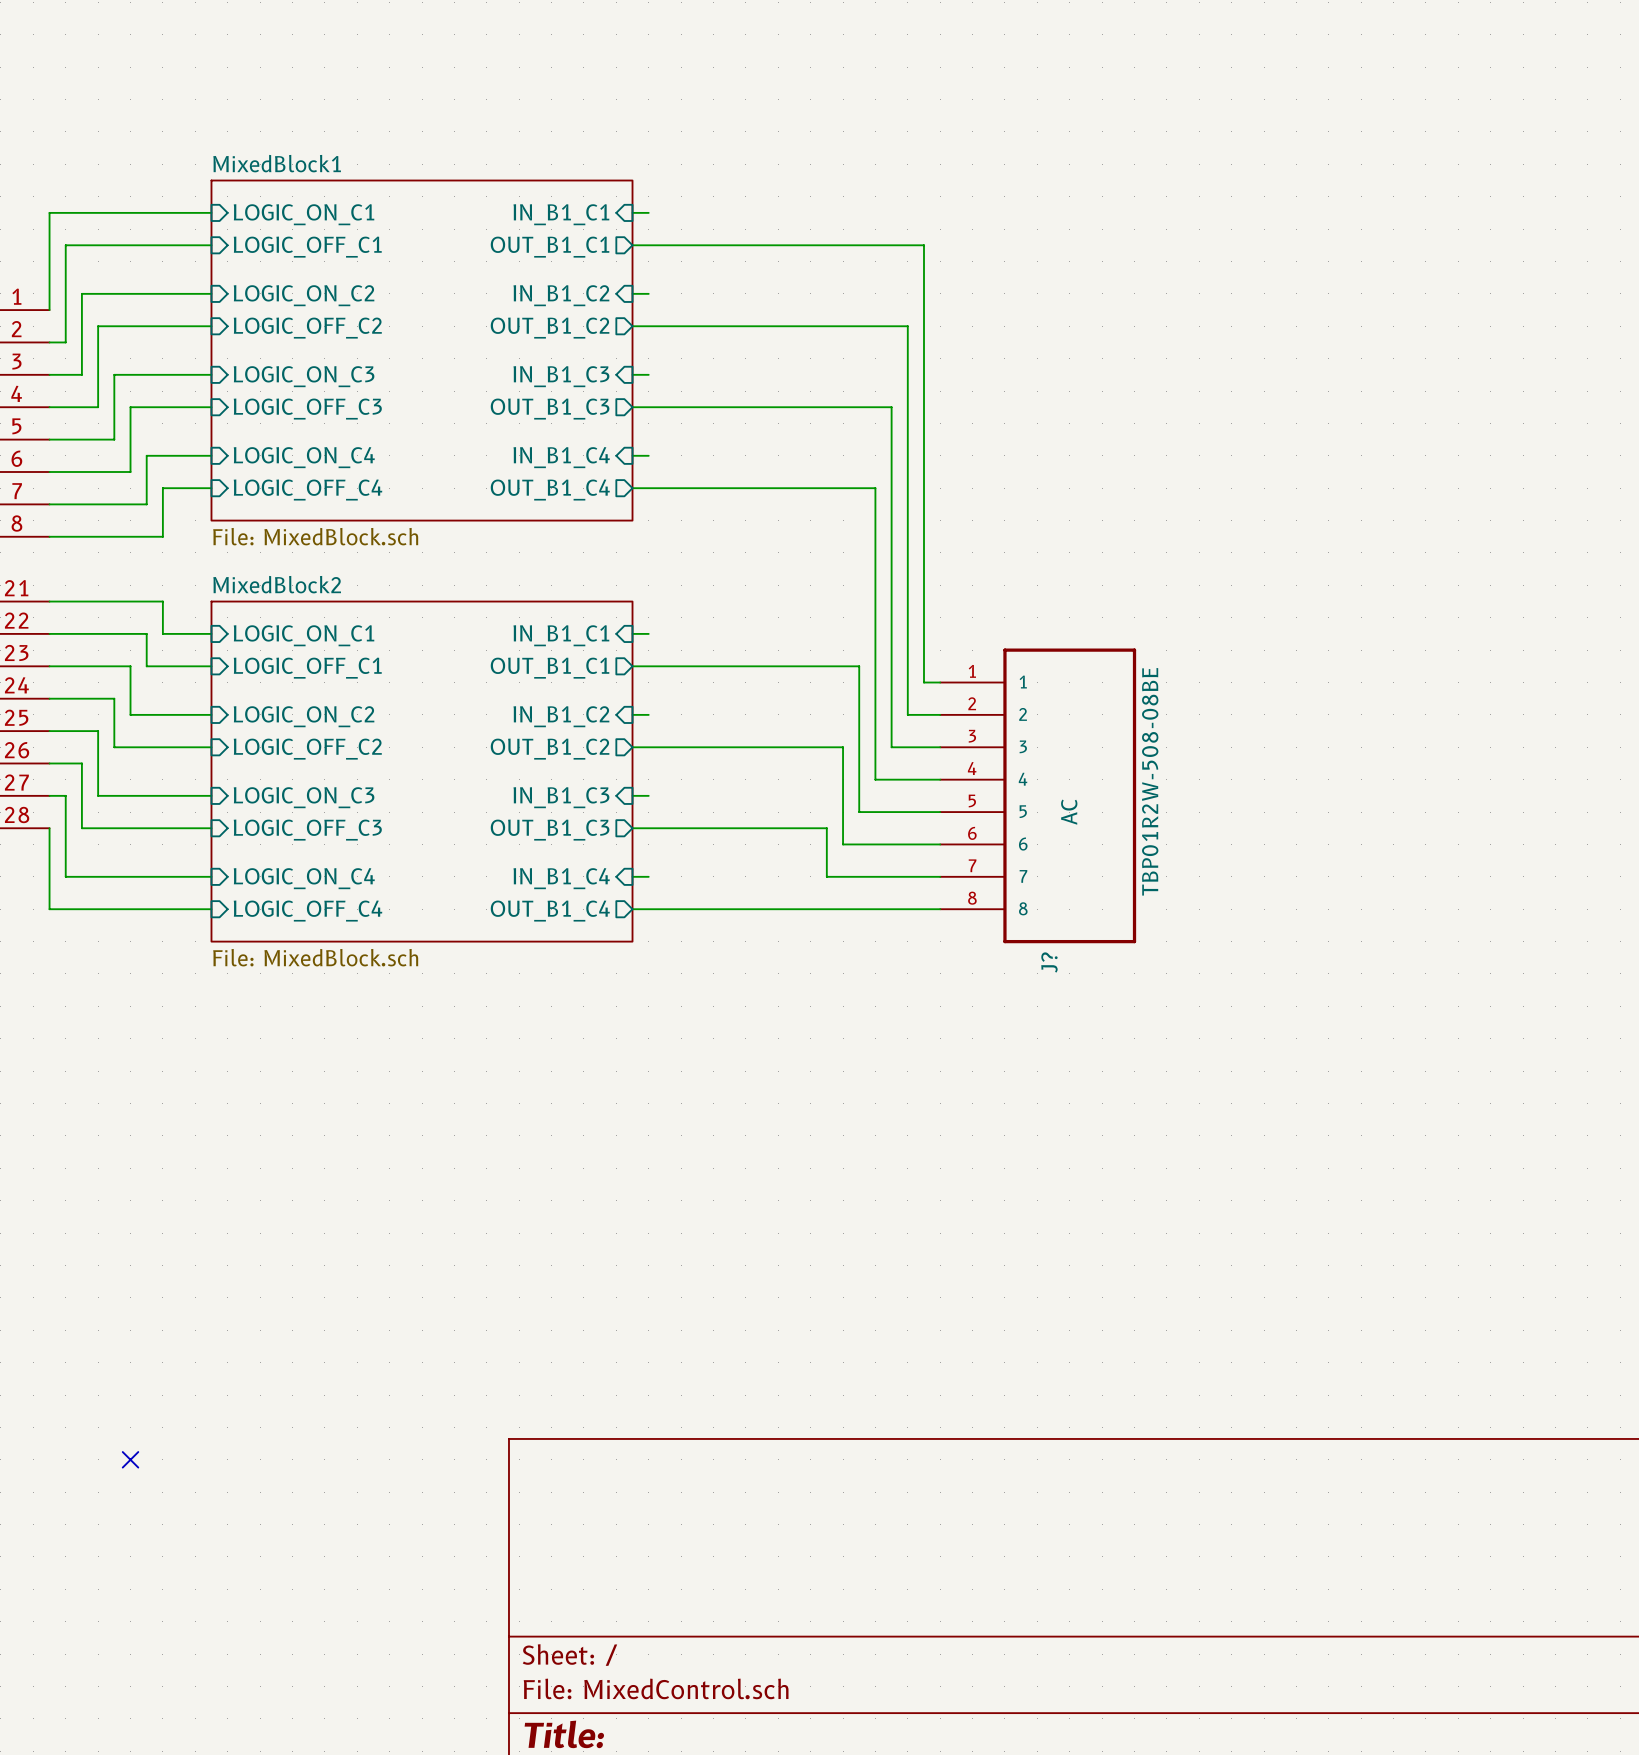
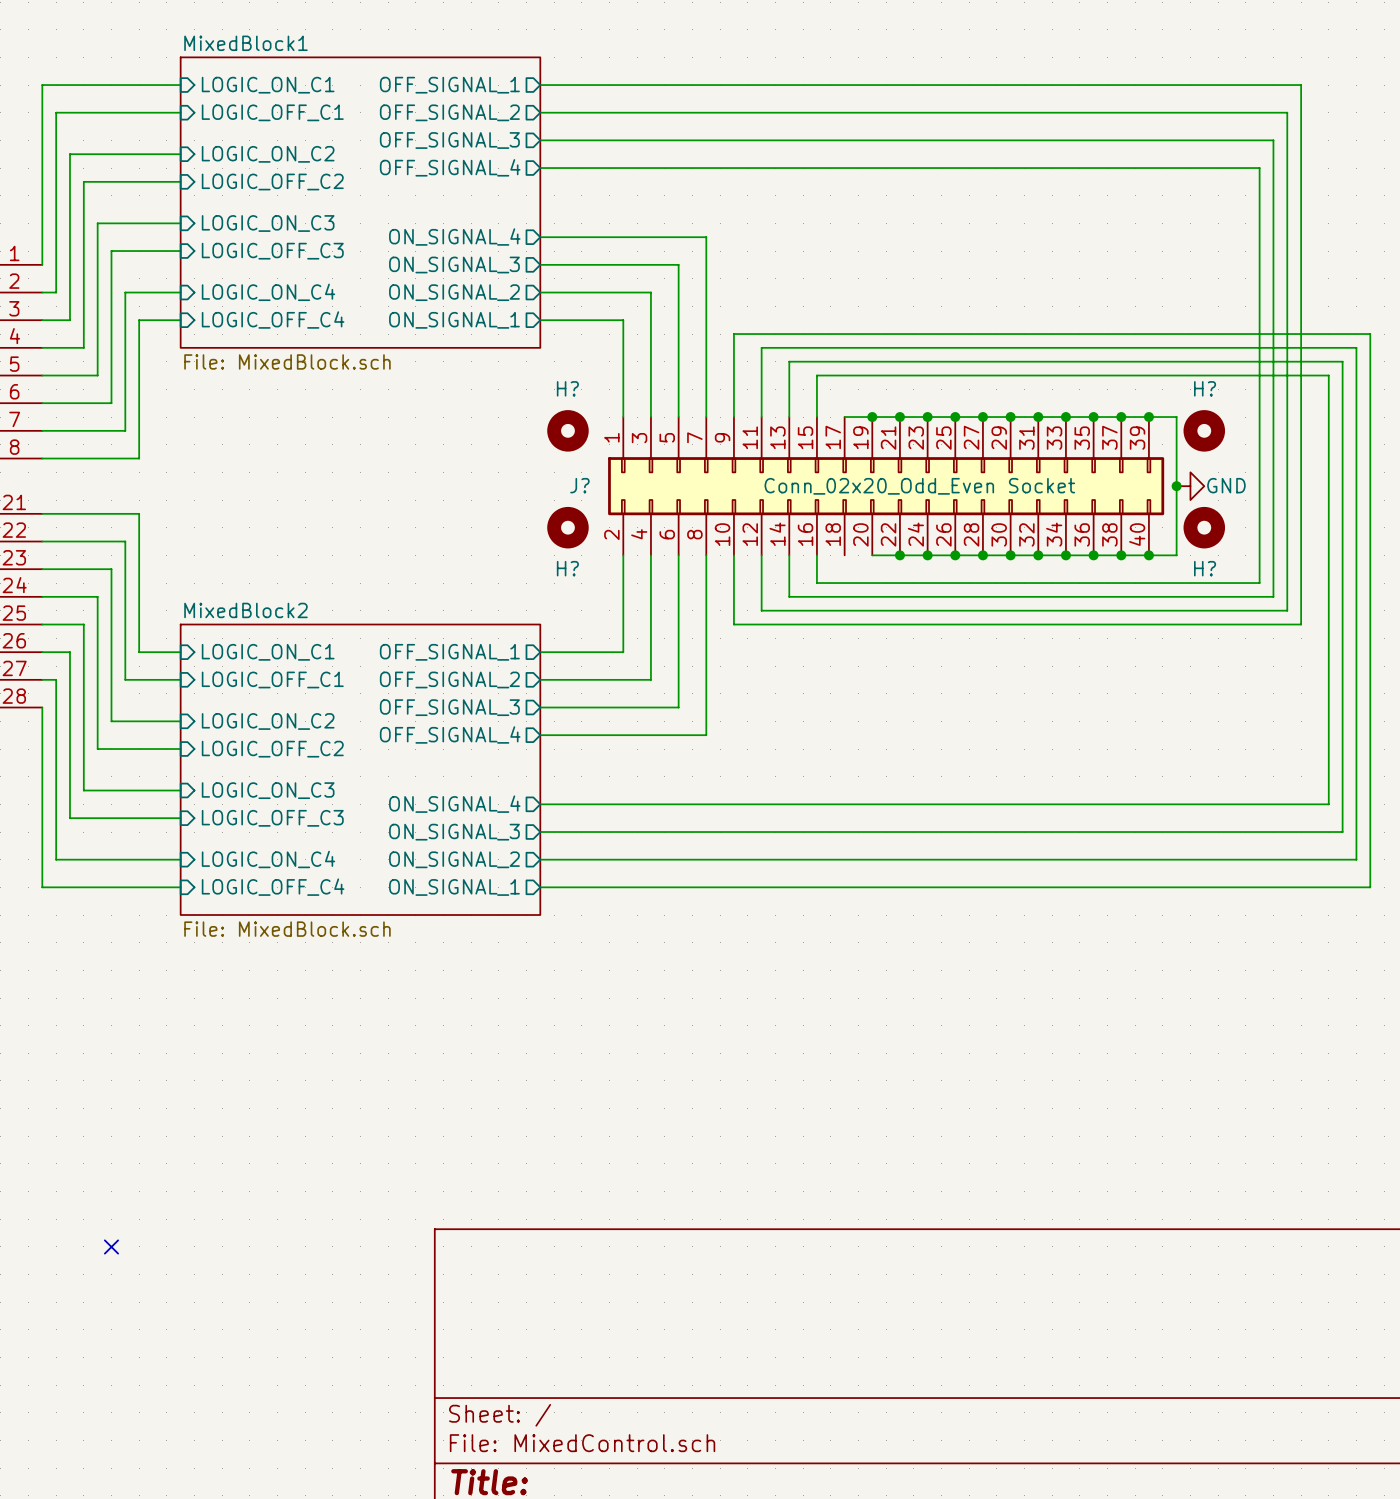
wire: none -> (180, 85) (42, 85) (42, 181)
sheet pin: none -> LOGIC_ON_C1 (268, 85)
sheet pin: none -> OFF_SIGNAL_1 (449, 85)
wire: none -> (540, 112) (1287, 112) (1287, 610) (803, 610)
sheet pin: none -> OFF_SIGNAL_2 (449, 112)
sheet pin: none -> OFF_SIGNAL_3 (449, 140)
wire: none -> (180, 154) (69, 154) (69, 251)
sheet pin: none -> LOGIC_ON_C2 (268, 154)
wire: none -> (540, 168) (1259, 168) (1259, 583) (816, 583) (816, 555)
sheet pin: none -> OFF_SIGNAL_4 (450, 167)
wire: (49, 212) (98, 212) -> (83, 278) (83, 181)
wire: (632, 212) (648, 212) -> none
sheet pin: LOGIC_ON_C1 (304, 214) -> LOGIC_OFF_C2 (272, 182)
sheet pin: IN_B1_C1 (561, 214) -> none
wire: (65, 245) (211, 245) -> (56, 209) (56, 112) (180, 112)
wire: (632, 245) (924, 245) (924, 423) -> (540, 832) (1342, 832) (1342, 361) (789, 361)
sheet pin position: LOGIC_OFF_C1 (307, 247) -> LOGIC_OFF_C1 (272, 112)
sheet pin: OUT_B1_C1 (550, 247) -> none
sheet pin: none -> LOGIC_ON_C3 (268, 223)
wire: none -> (540, 237) (706, 237) (706, 417)
sheet pin: none -> ON_SIGNAL_4 (454, 237)
wire: (81, 293) (130, 293) -> (111, 347) (111, 251)
wire: (632, 293) (648, 293) -> none
sheet pin: LOGIC_ON_C2 (304, 295) -> LOGIC_OFF_C3 (272, 251)
sheet pin: IN_B1_C2 (561, 295) -> none
wire: none -> (540, 264) (678, 264) (678, 417)
sheet pin: none -> ON_SIGNAL_3 (454, 265)
wire: (98, 326) (211, 326) -> none
wire: (632, 326) (907, 326) (907, 714) -> none
sheet pin: LOGIC_OFF_C2 (307, 328) -> none
sheet pin: OUT_B1_C2 (550, 328) -> none
wire: none -> (540, 292) (650, 292) (650, 417)
sheet pin: none -> ON_SIGNAL_2 (454, 292)
sheet MixedBlock1 position: (422, 350) -> (360, 202)
wire: (114, 374) (162, 374) -> (97, 320) (97, 223) (180, 223)
wire: none -> (554, 320) (623, 320) (623, 417)
sheet pin: LOGIC_ON_C3 (304, 376) -> LOGIC_OFF_C4 (273, 320)
sheet pin shape: input (561, 376) -> output (454, 320)
sheet pin: IN_B1_C3 (561, 376) -> ON_SIGNAL_1 (454, 320)
wire: (130, 407) (211, 407) -> none
wire: (632, 407) (891, 407) -> (540, 859) (1356, 859) (1356, 347) (761, 347)
sheet pin: LOGIC_OFF_C3 (307, 409) -> none
sheet pin: OUT_B1_C3 (550, 409) -> none
wire: (146, 455) (211, 455) -> (125, 389) (125, 292) (180, 292)
wire: (632, 455) (648, 455) -> none
sheet pin position: LOGIC_ON_C4 (304, 457) -> LOGIC_ON_C4 (268, 292)
sheet pin: IN_B1_C4 (561, 457) -> none
wire: (162, 488) (211, 488) -> (139, 417) (139, 320)
wire: (632, 488) (875, 488) (875, 779) (940, 779) -> none
wire: none -> (733, 417) (733, 334) (1370, 334) (1370, 887) (540, 887)
wire: none -> (816, 417) (816, 375) (1328, 375) (1328, 804) (540, 804)
wire: none -> (844, 417) (1176, 417) (1176, 555) (872, 555)
junction: none -> (872, 417)
junction: none -> (899, 417)
junction: none -> (927, 417)
junction: none -> (955, 417)
junction: none -> (982, 417)
junction: none -> (1010, 417)
junction: none -> (1038, 417)
junction: none -> (1065, 417)
junction: none -> (1093, 417)
junction: none -> (1121, 417)
junction: none -> (1148, 417)
sheet pin: LOGIC_OFF_C4 (308, 490) -> none
sheet pin: OUT_B1_C4 (550, 490) -> none
H?: none -> (567, 430)
H?: none -> (1204, 430)
J?: none -> Conn_02x20_Odd_Even Socket (886, 486)
junction: none -> (1176, 486)
power symbol: none -> GND (1190, 486)
H?: none -> (567, 527)
H?: none -> (1204, 527)
wire: (162, 633) (211, 633) -> (139, 541) (139, 652) (180, 652)
wire: (632, 633) (648, 633) -> none
sheet pin position: LOGIC_ON_C1 (304, 635) -> LOGIC_ON_C1 (268, 652)
sheet pin: IN_B1_C1 (561, 635) -> none
wire: none -> (623, 555) (623, 652) (540, 652)
wire: none -> (650, 555) (650, 679) (554, 679)
wire: none -> (706, 555) (706, 707)
junction: none -> (899, 555)
junction: none -> (927, 555)
junction: none -> (955, 555)
junction: none -> (982, 555)
junction: none -> (1010, 555)
junction: none -> (1038, 555)
junction: none -> (1065, 555)
junction: none -> (1093, 555)
junction: none -> (1121, 555)
junction: none -> (1148, 555)
wire: (146, 666) (211, 666) -> none
wire: (632, 666) (859, 666) -> (733, 555) (733, 569)
sheet pin: LOGIC_OFF_C1 (307, 668) -> none
sheet pin: OUT_B1_C1 (550, 668) -> none
wire: (924, 682) (940, 682) -> (789, 583) (789, 596) (1273, 596) (1273, 140) (540, 140)
wire: (130, 714) (211, 714) -> (111, 610) (111, 721) (180, 721)
wire: (632, 714) (648, 714) -> none
wire: (891, 714) (891, 747) (940, 747) -> (761, 610) (775, 610)
sheet pin position: LOGIC_ON_C2 (304, 716) -> LOGIC_ON_C2 (268, 721)
sheet pin: IN_B1_C2 (561, 716) -> none
wire: (859, 731) (859, 812) (940, 812) -> (733, 624) (1301, 624) (1301, 85) (540, 85)
wire: (114, 747) (211, 747) -> none
wire: (632, 747) (843, 747) (843, 844) (940, 844) -> none
sheet pin: LOGIC_OFF_C2 (307, 749) -> none
sheet pin: OUT_B1_C2 (550, 749) -> none
sheet pin: none -> OFF_SIGNAL_1 (449, 652)
sheet MixedBlock2 position: (422, 771) -> (360, 769)
wire: (98, 795) (146, 795) -> (125, 569) (125, 679)
wire: none -> (83, 679) (83, 790) (180, 790)
J?: TBP01R2W-508-08BE (1038, 795) -> none
sheet pin: LOGIC_ON_C3 (304, 797) -> LOGIC_OFF_C1 (272, 679)
sheet pin shape: input (561, 797) -> output (449, 679)
sheet pin: IN_B1_C3 (561, 797) -> OFF_SIGNAL_2 (449, 679)
wire: (81, 828) (211, 828) -> (69, 707) (69, 818) (180, 818)
wire: (794, 828) (826, 828) -> (678, 707) (678, 555)
sheet pin position: LOGIC_OFF_C3 (307, 830) -> LOGIC_OFF_C3 (272, 818)
sheet pin: OUT_B1_C3 (550, 830) -> OFF_SIGNAL_3 (449, 707)
wire: (826, 860) (826, 876) (940, 876) -> (706, 735) (540, 735)
sheet pin: none -> OFF_SIGNAL_4 (450, 734)
wire: (65, 876) (114, 876) -> (97, 638) (97, 749)
wire: none -> (56, 749) (56, 859) (180, 859)
wire: (632, 876) (648, 876) -> none
sheet pin: LOGIC_ON_C4 (304, 878) -> LOGIC_OFF_C2 (272, 749)
sheet pin: IN_B1_C4 (561, 878) -> none
wire: (49, 909) (211, 909) -> (42, 776) (42, 887) (180, 887)
wire: (632, 909) (940, 909) -> none
sheet pin position: LOGIC_OFF_C4 (308, 911) -> LOGIC_OFF_C4 (273, 887)
sheet pin: OUT_B1_C4 (550, 911) -> none
sheet pin: none -> LOGIC_ON_C3 (268, 790)
sheet pin: none -> ON_SIGNAL_4 (454, 804)
sheet pin: none -> ON_SIGNAL_3 (454, 832)
sheet pin: none -> LOGIC_ON_C4 (268, 859)
sheet pin: none -> ON_SIGNAL_2 (454, 859)
sheet pin: none -> ON_SIGNAL_1 (454, 887)

